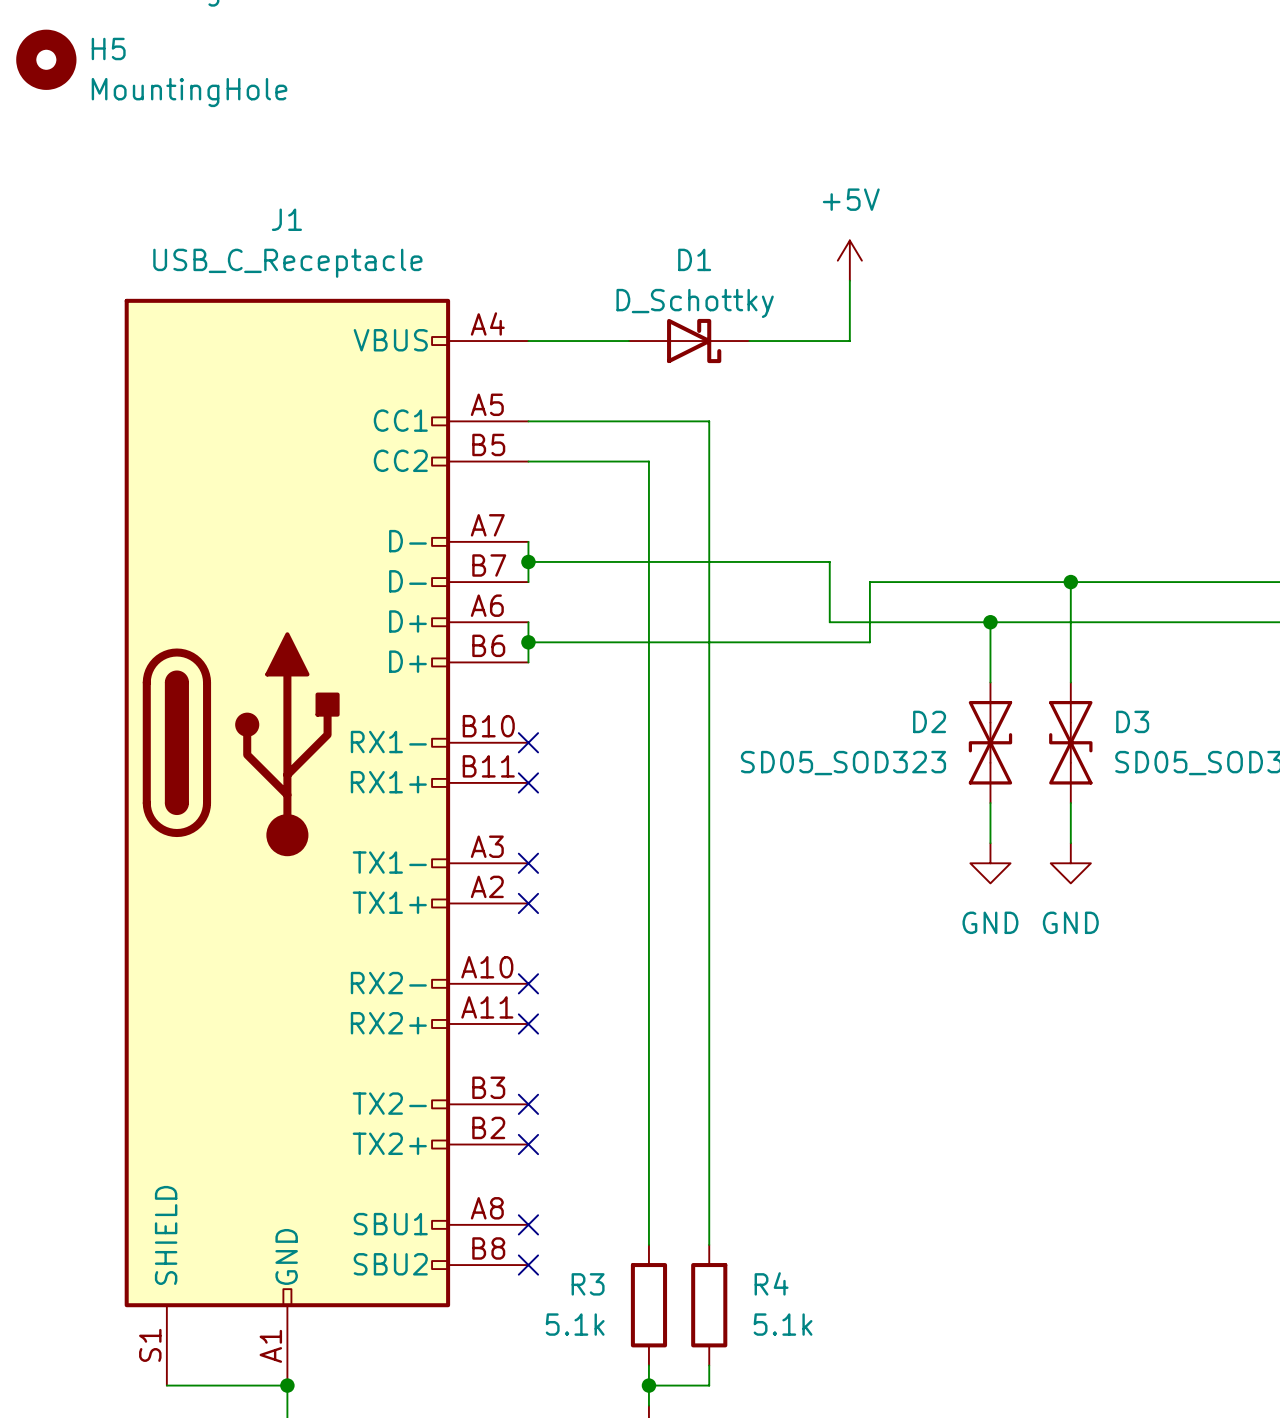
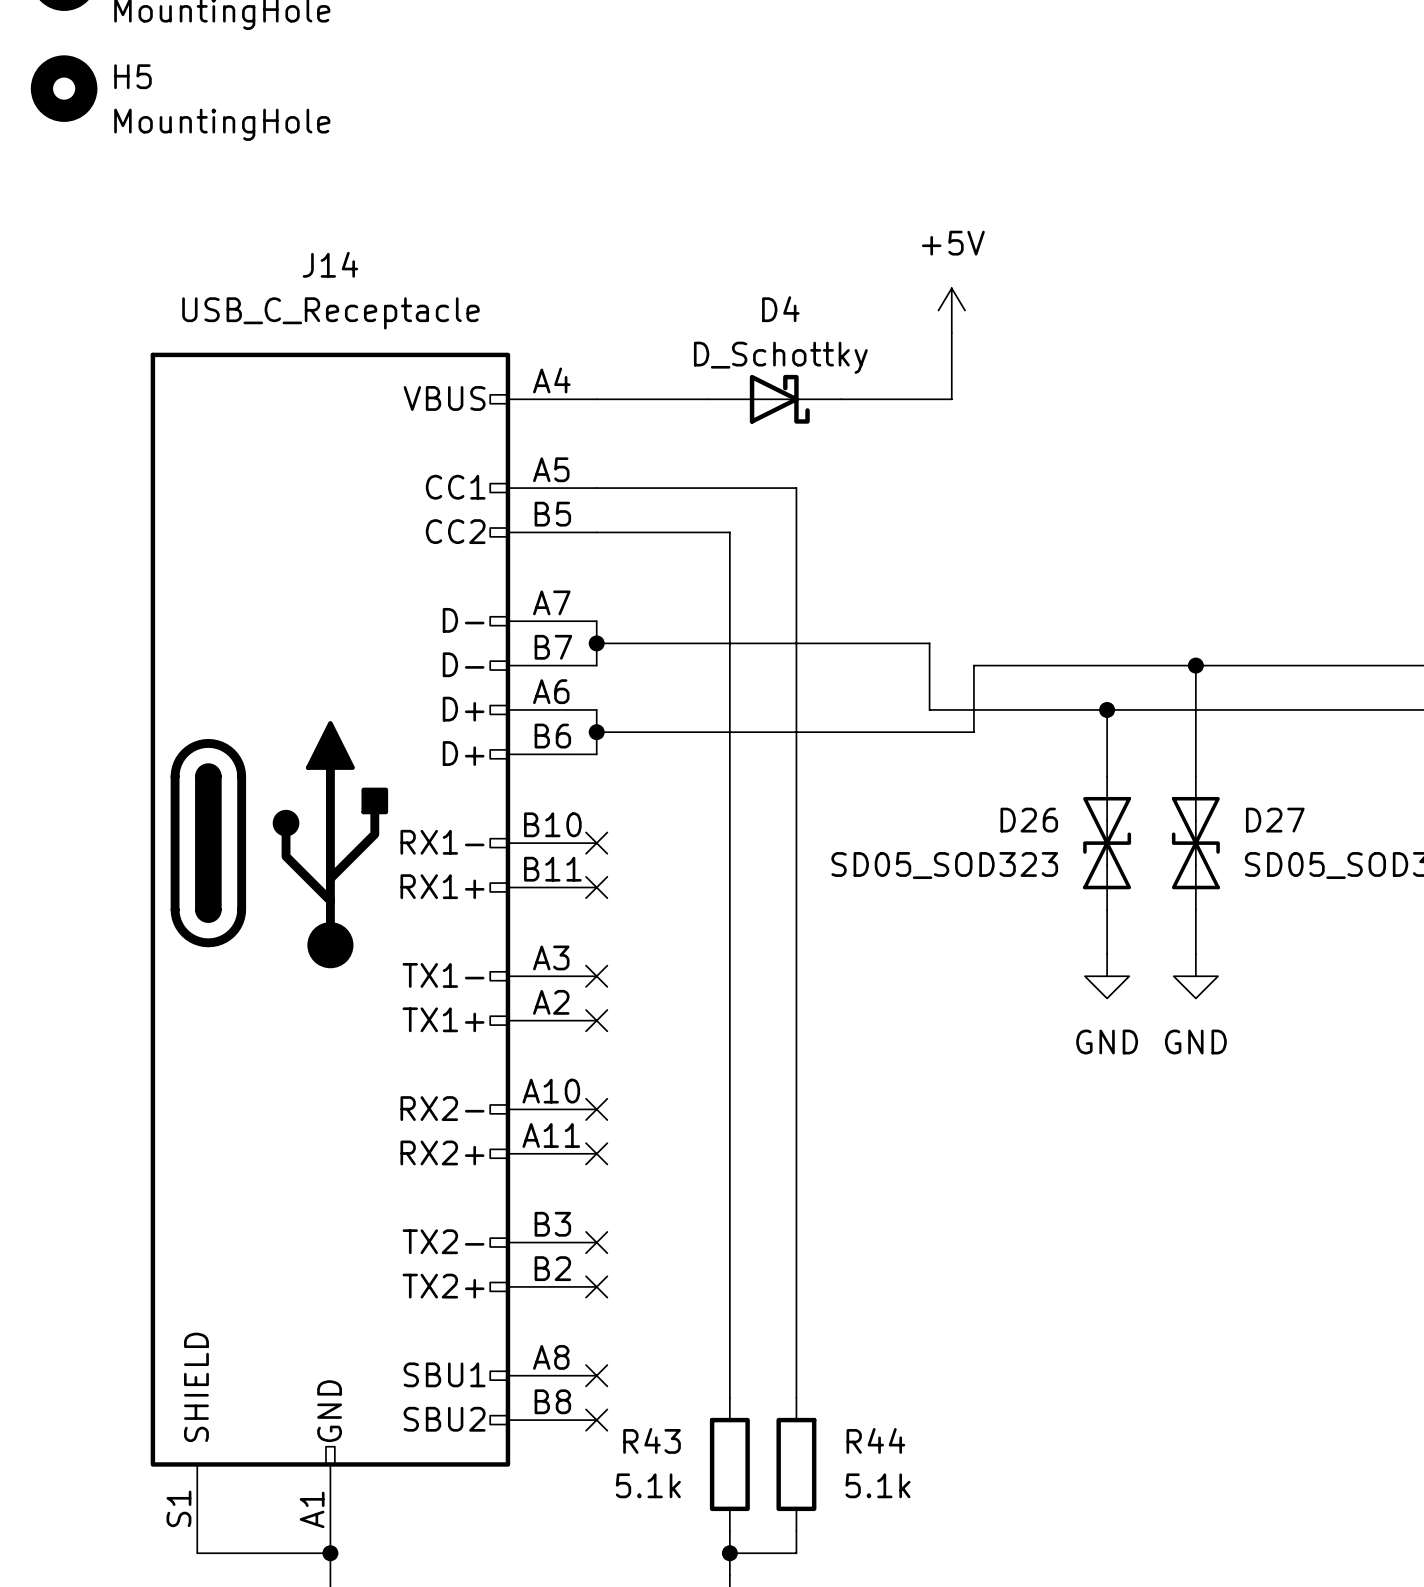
J1 name: J1 (286, 219) -> J14 (330, 264)
D1 name: D1 (694, 259) -> D4 (780, 309)
D2 name: D2 (929, 721) -> D26 (1029, 820)
D3 name: D3 (1132, 721) -> D27 (1275, 820)
R4 name: R4 (771, 1283) -> R44 (875, 1440)
R3 name: R3 (588, 1284) -> R43 (652, 1440)

